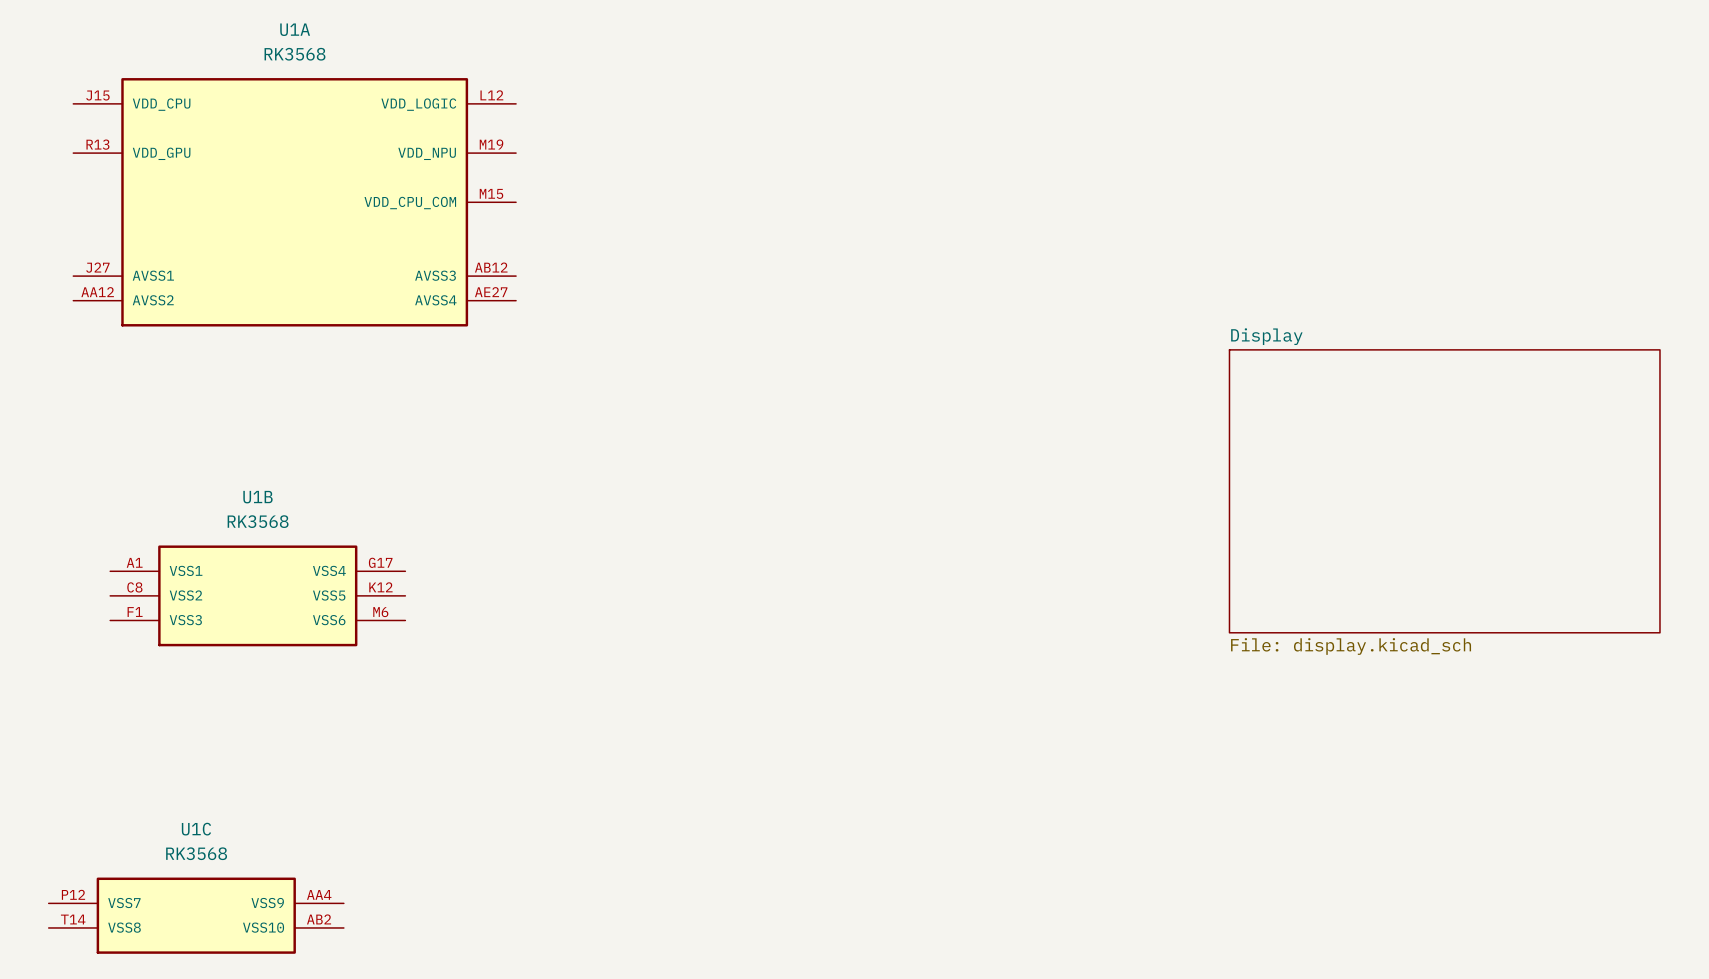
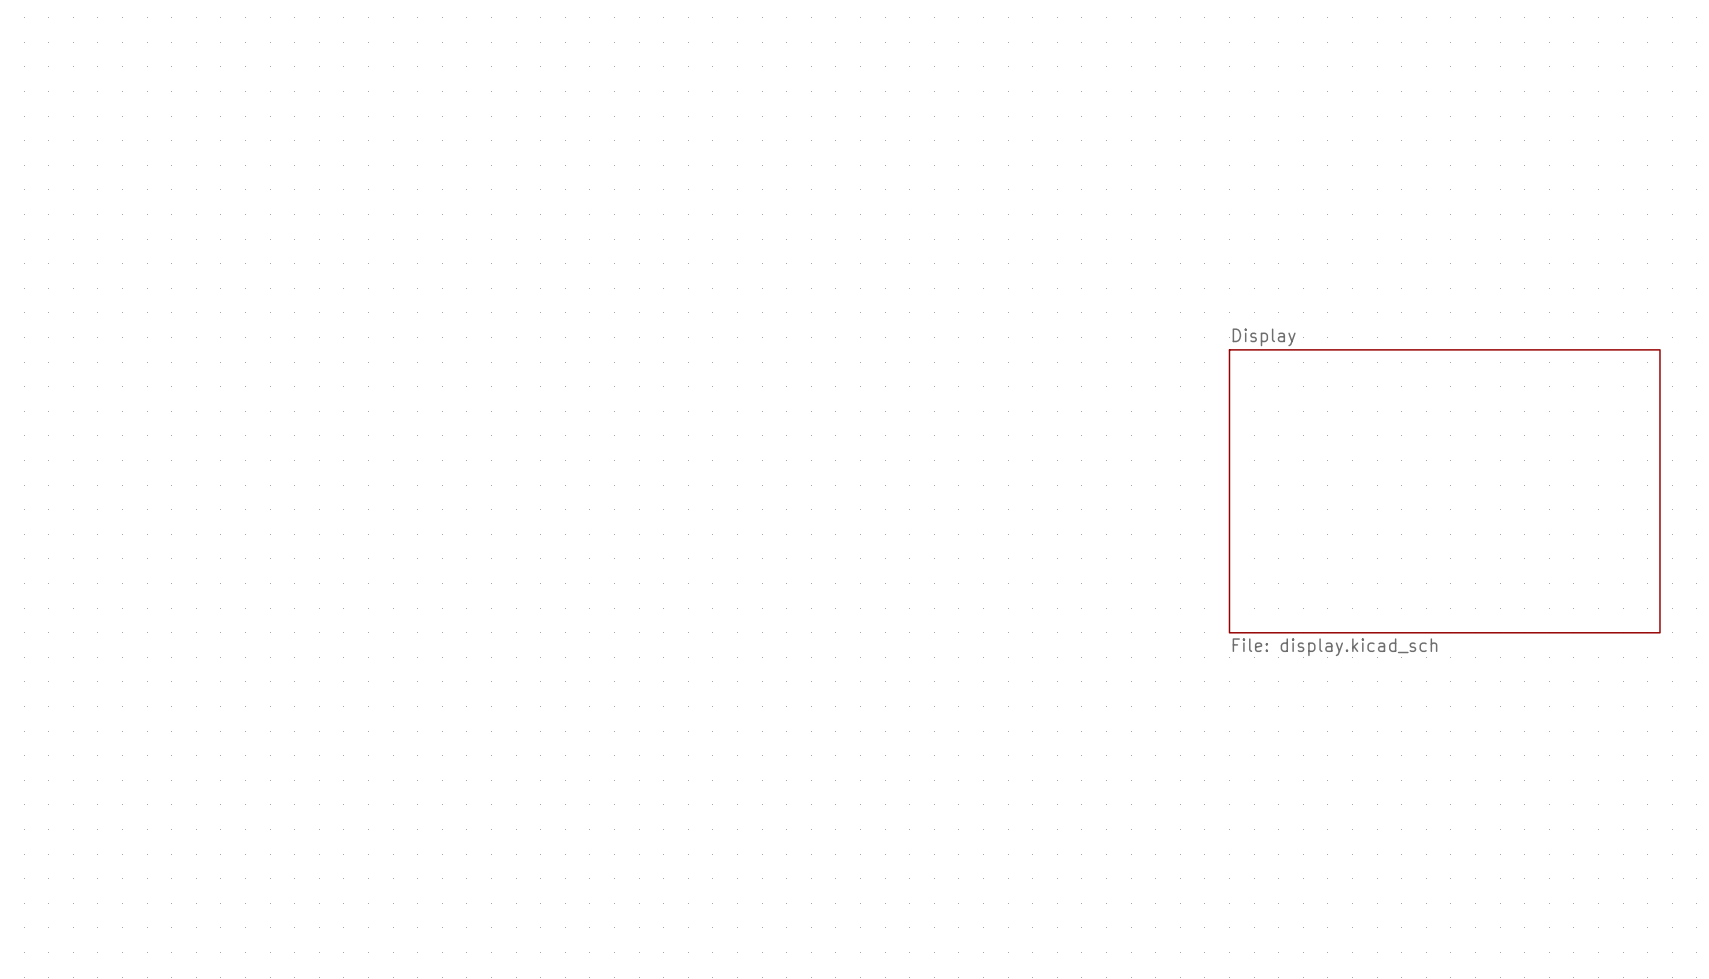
U1A: RK3568 (294, 202) -> none
U1B: RK3568 (257, 595) -> none
U1C: RK3568 (196, 915) -> none

